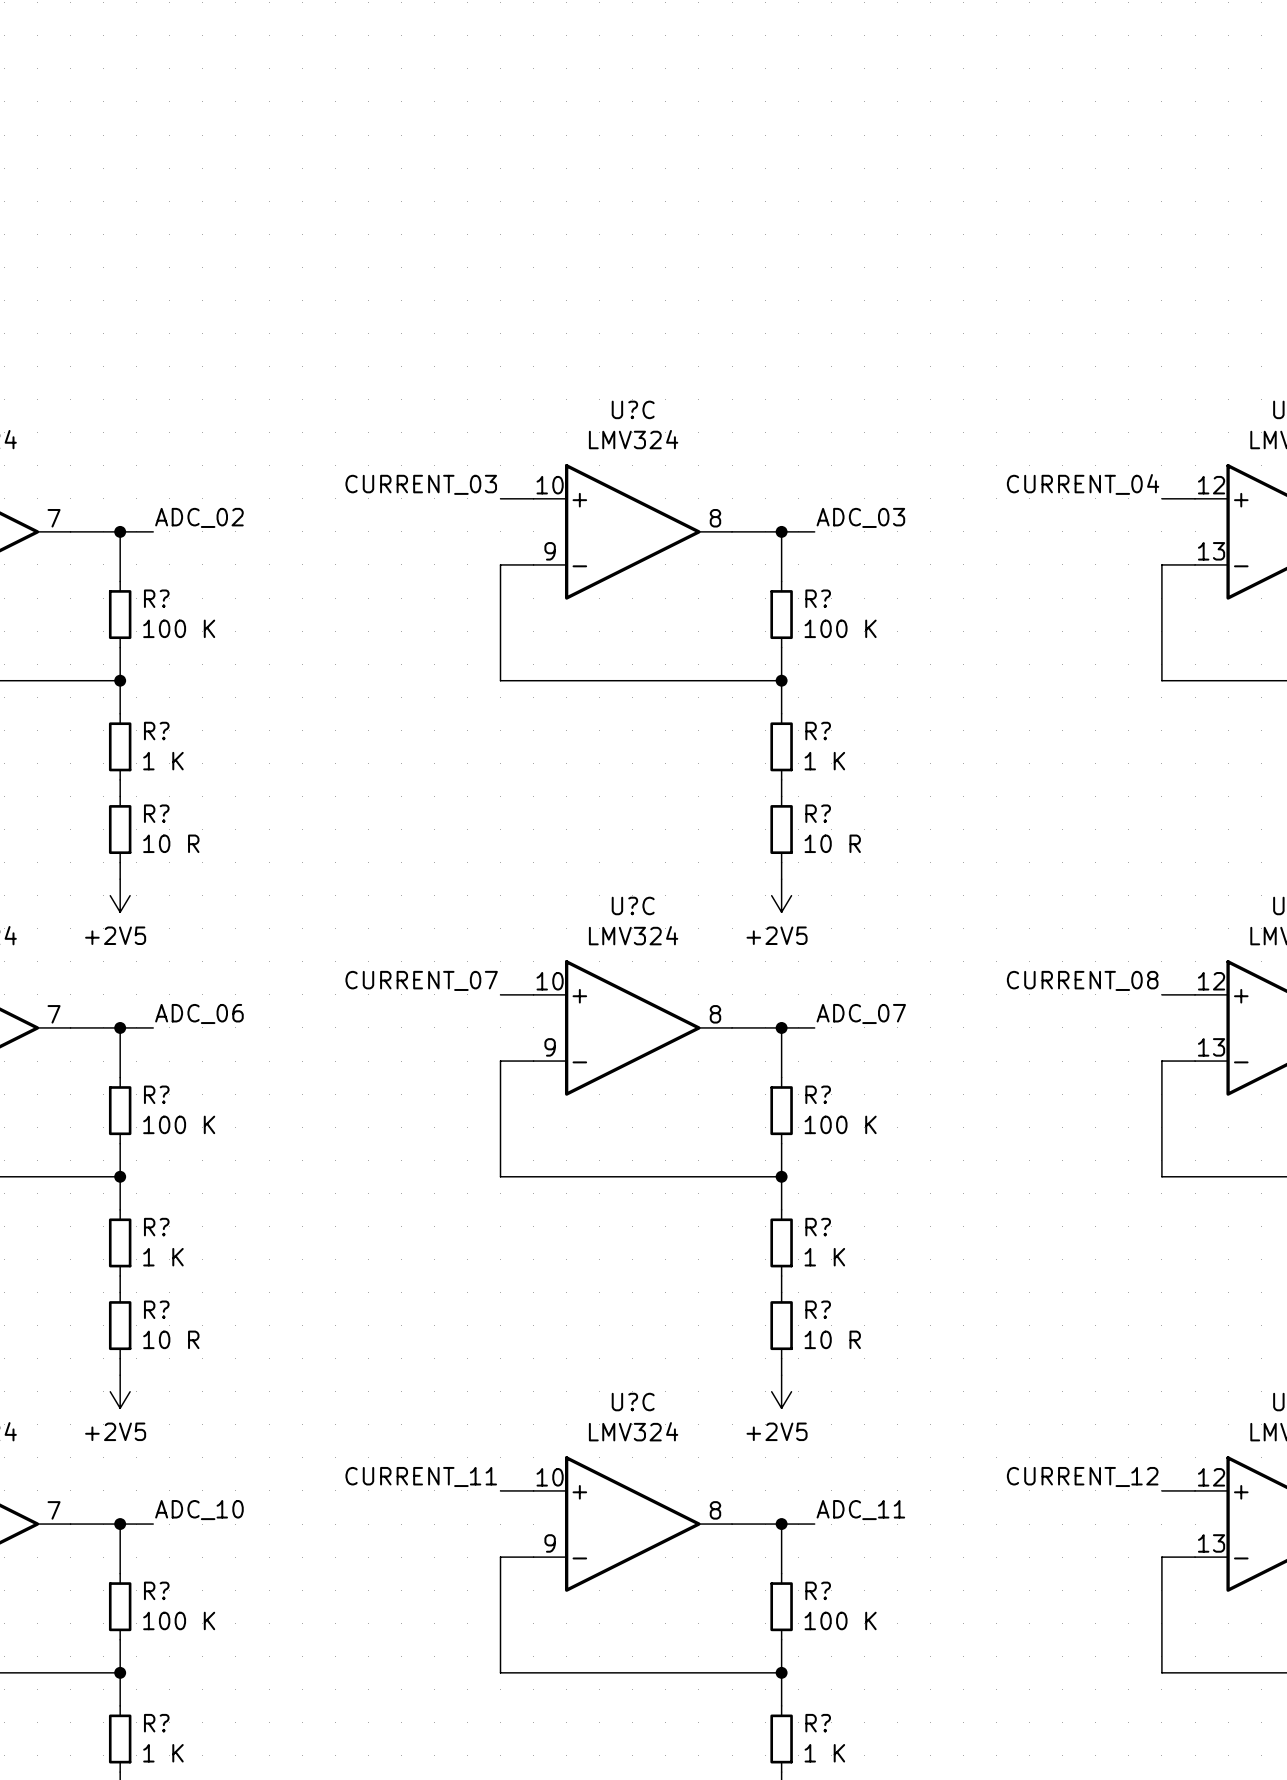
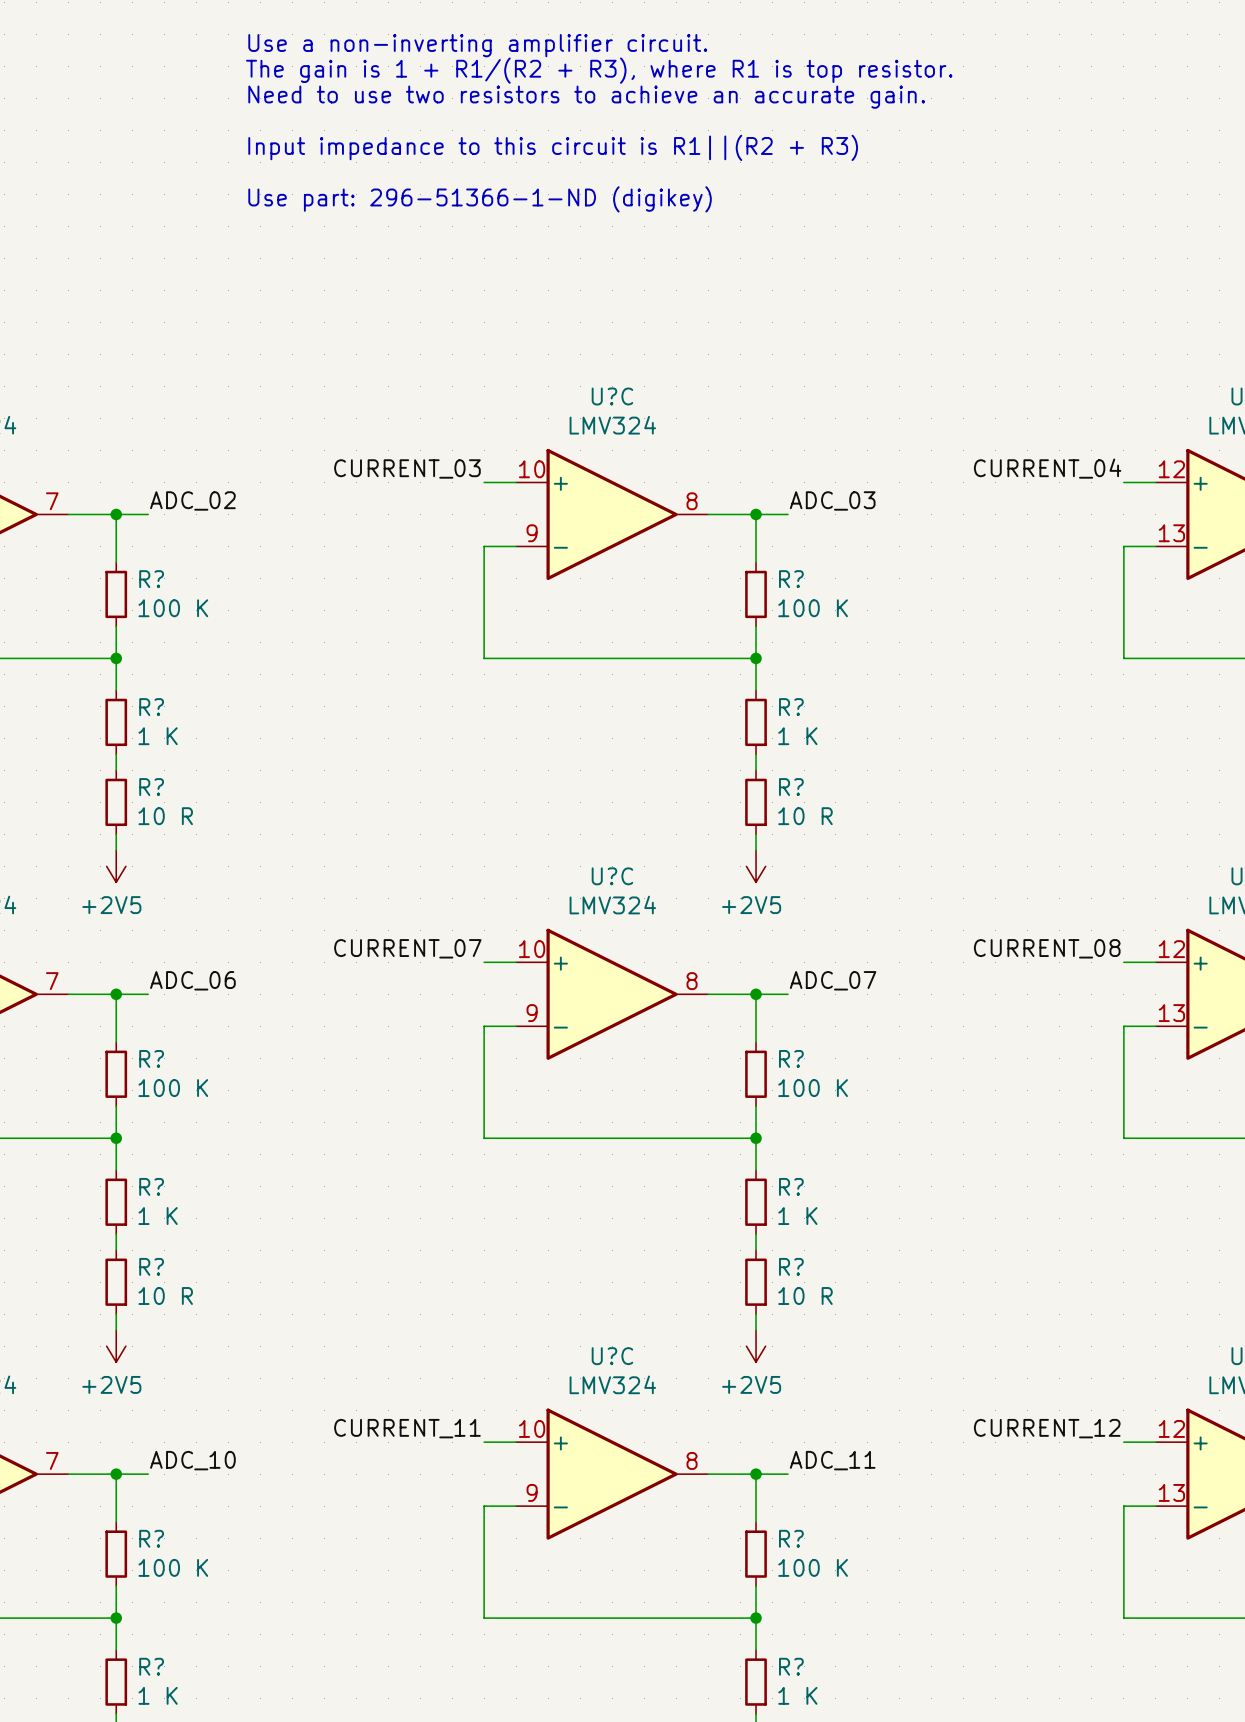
text: none -> Use a non-inverting amplifier circuit. (477, 45)
text: none -> The gain is 1 + R1/(R2 + R3), where R1 is top resistor. (599, 70)
text: none -> Need to use two resistors to achieve an accurate gain. (586, 97)
text: none -> Input impedance to this circuit is R1||(R2 + R3) (553, 147)
text: none -> Use part: 296-51366-1-ND (digikey) (480, 199)

